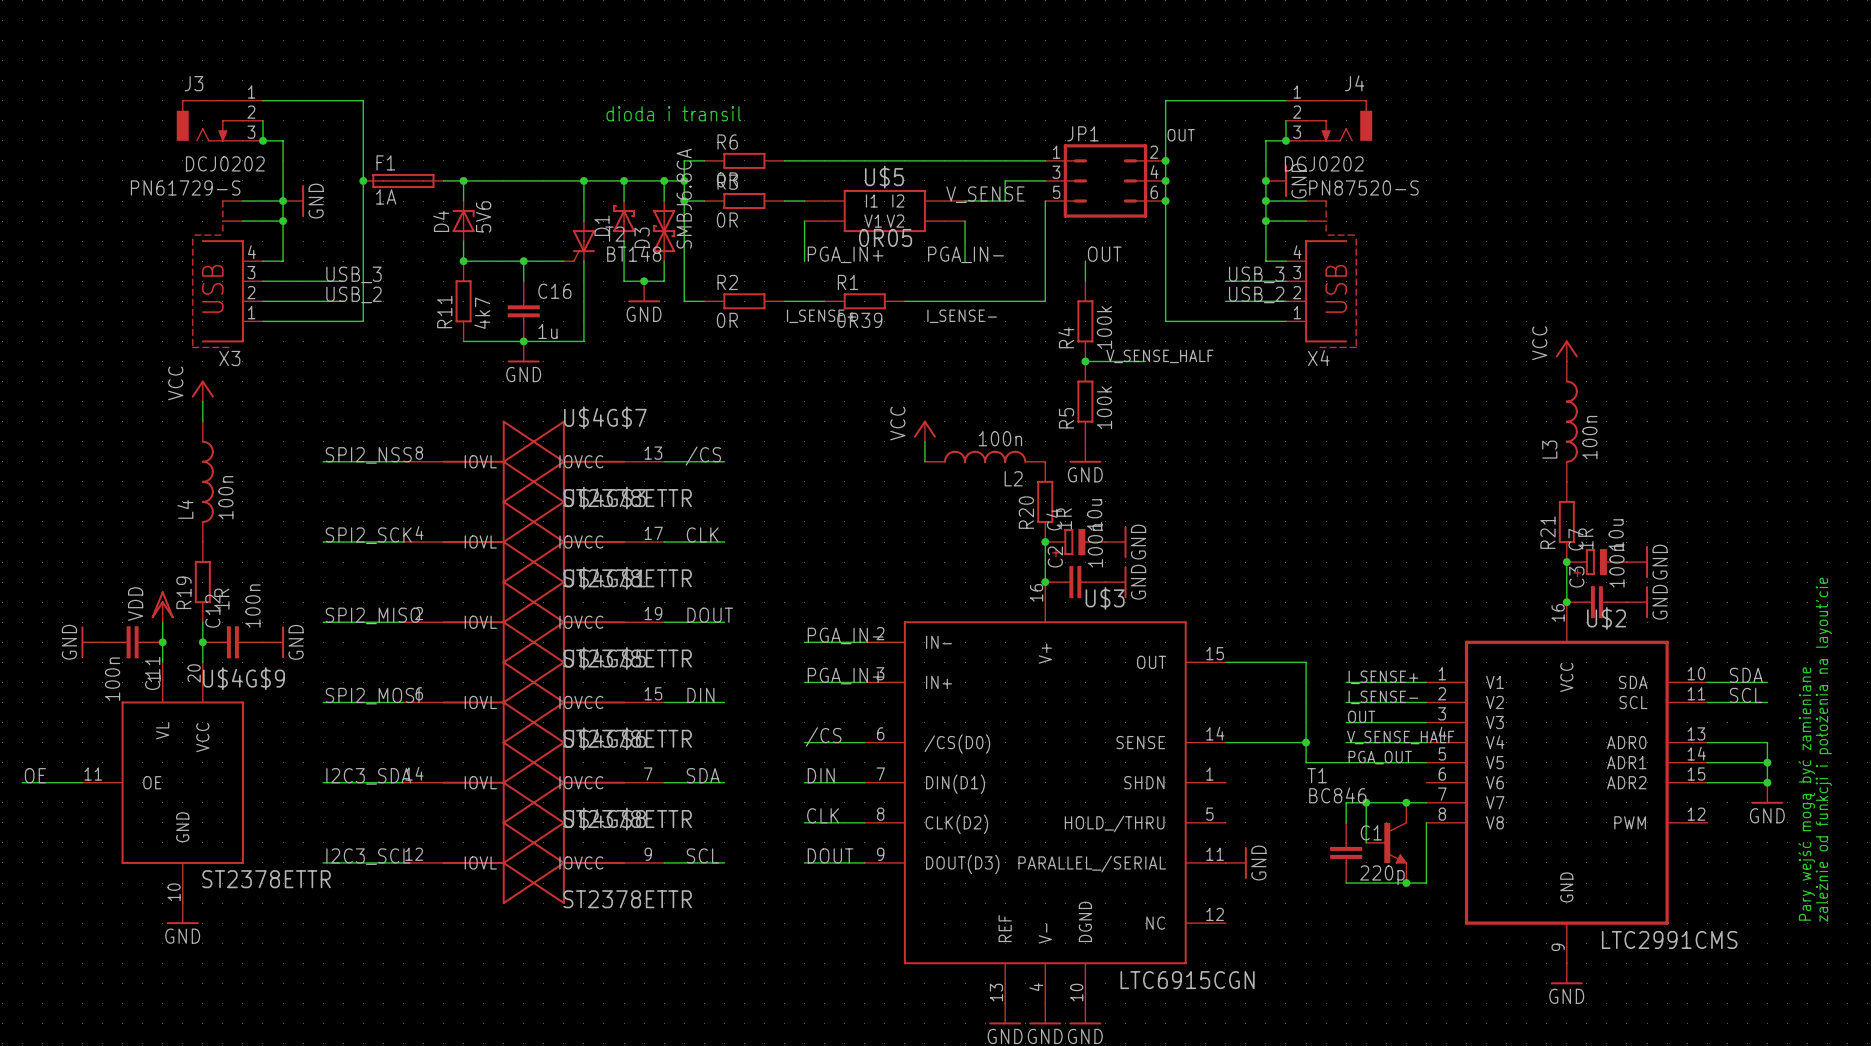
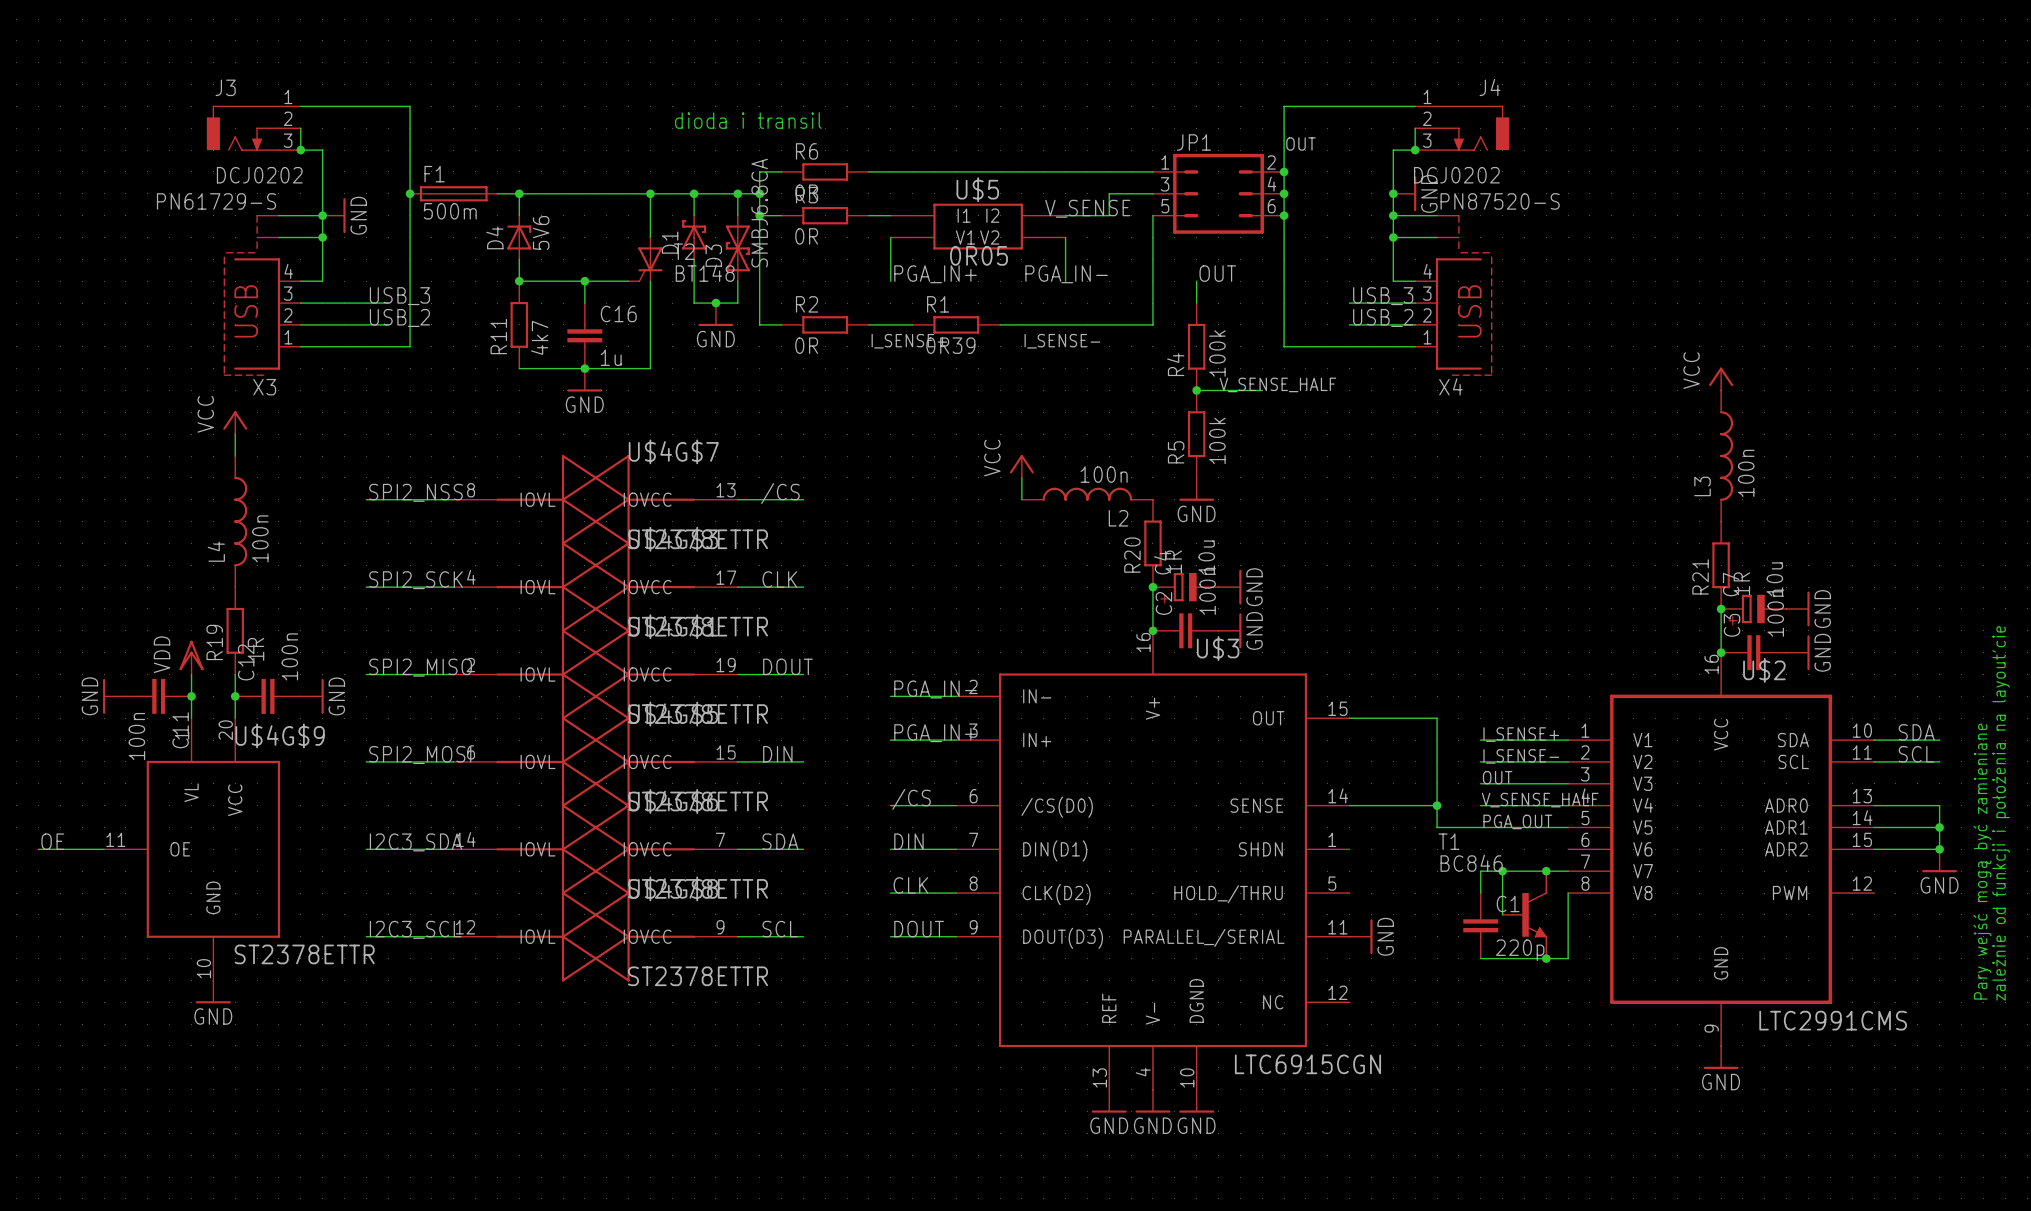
F1 value: 1A (386, 197) -> 500m (450, 211)

